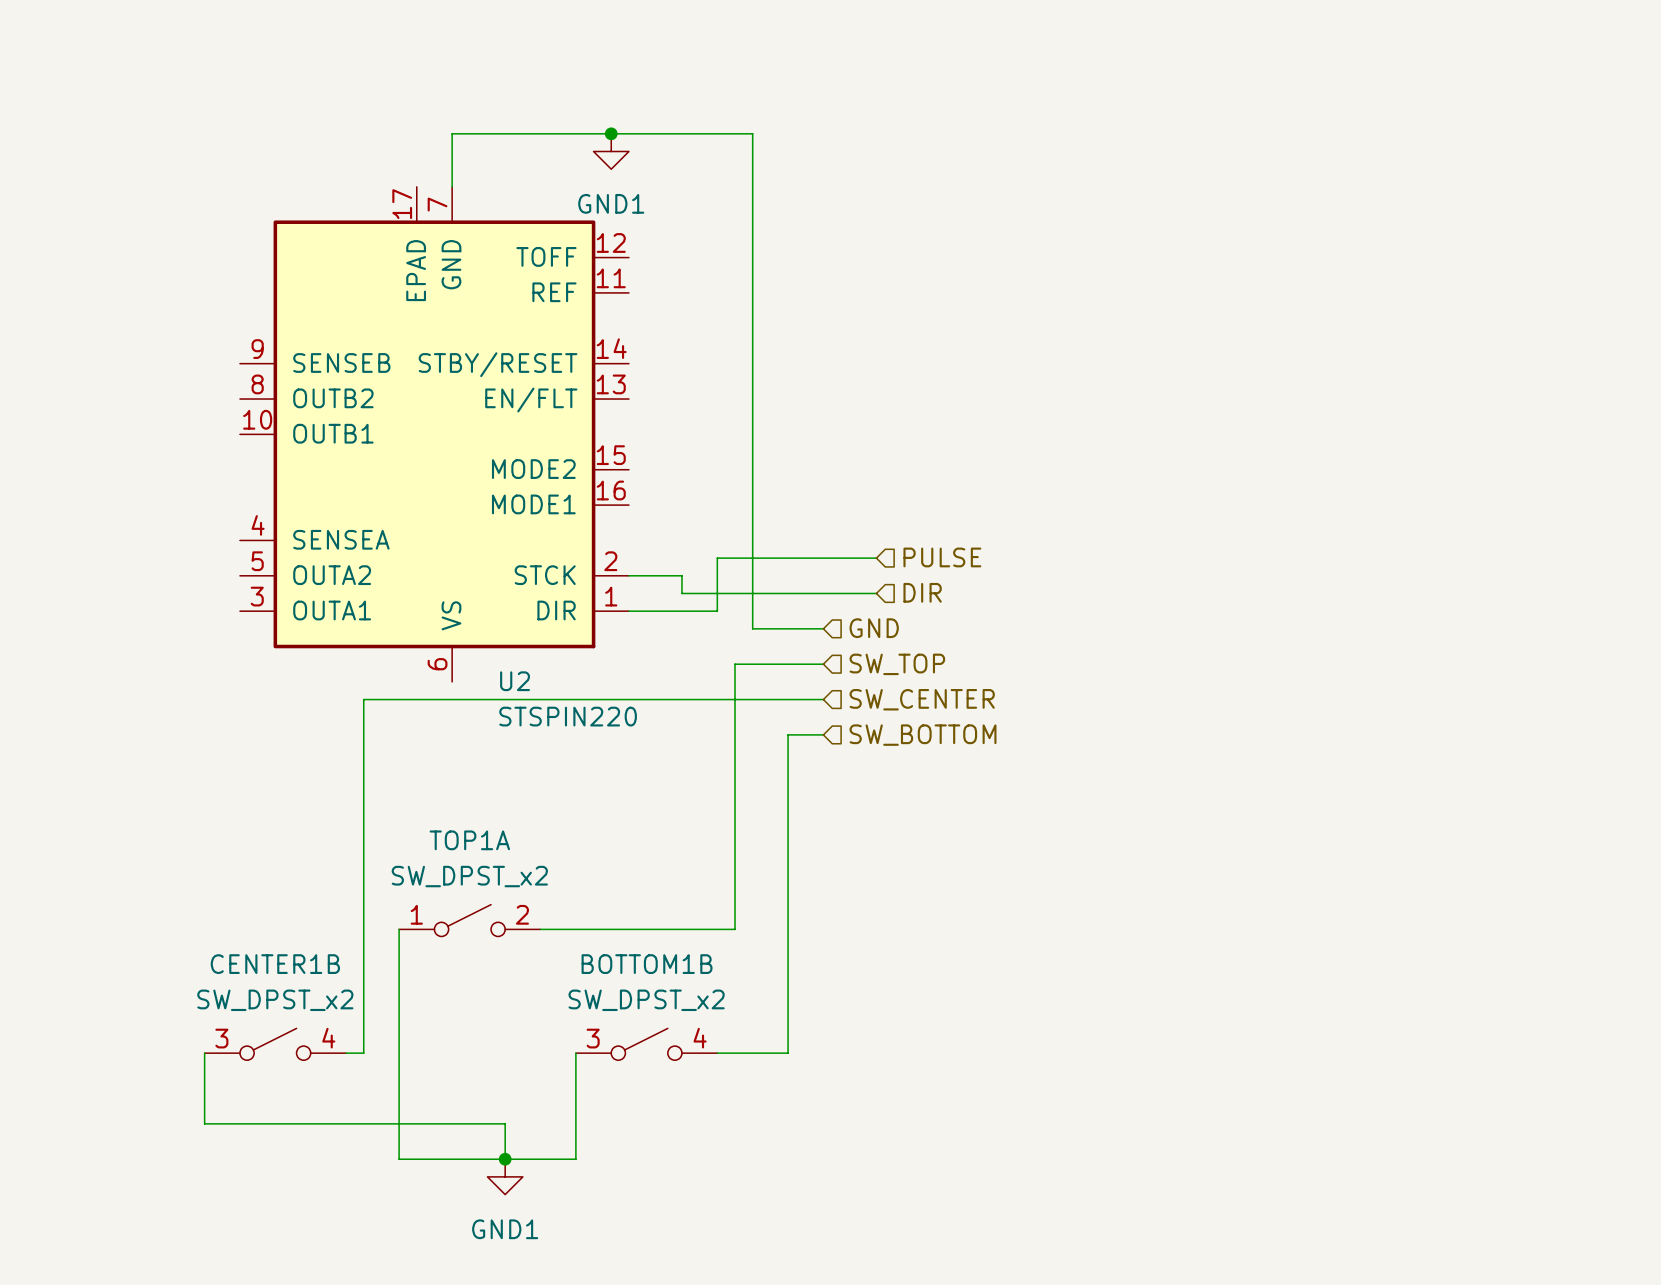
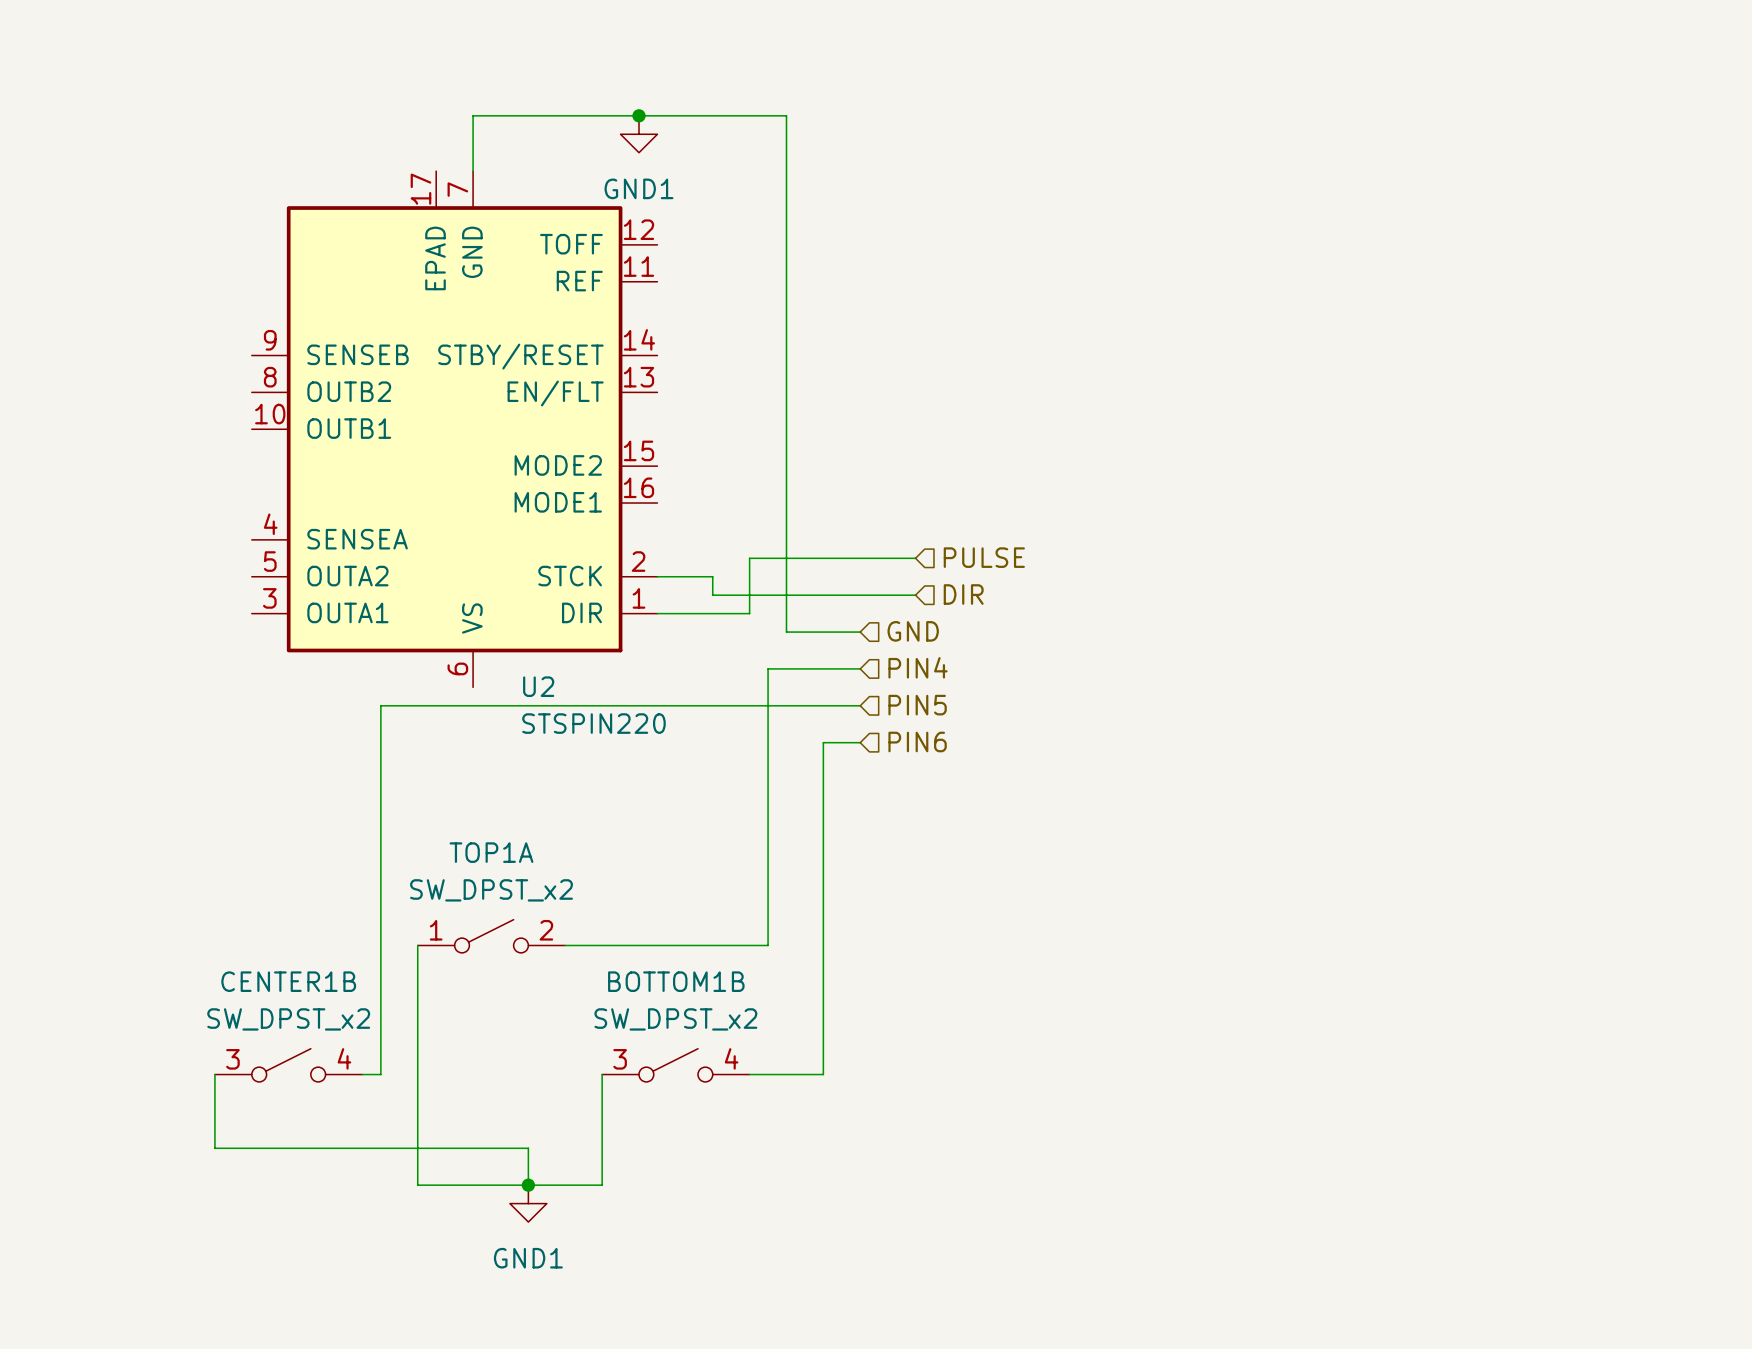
hierarchical label: SW_TOP (897, 664) -> PIN4 (918, 667)
hierarchical label: SW_CENTER (922, 699) -> PIN5 (917, 705)
hierarchical label: SW_BOTTOM (923, 735) -> PIN6 (917, 741)

